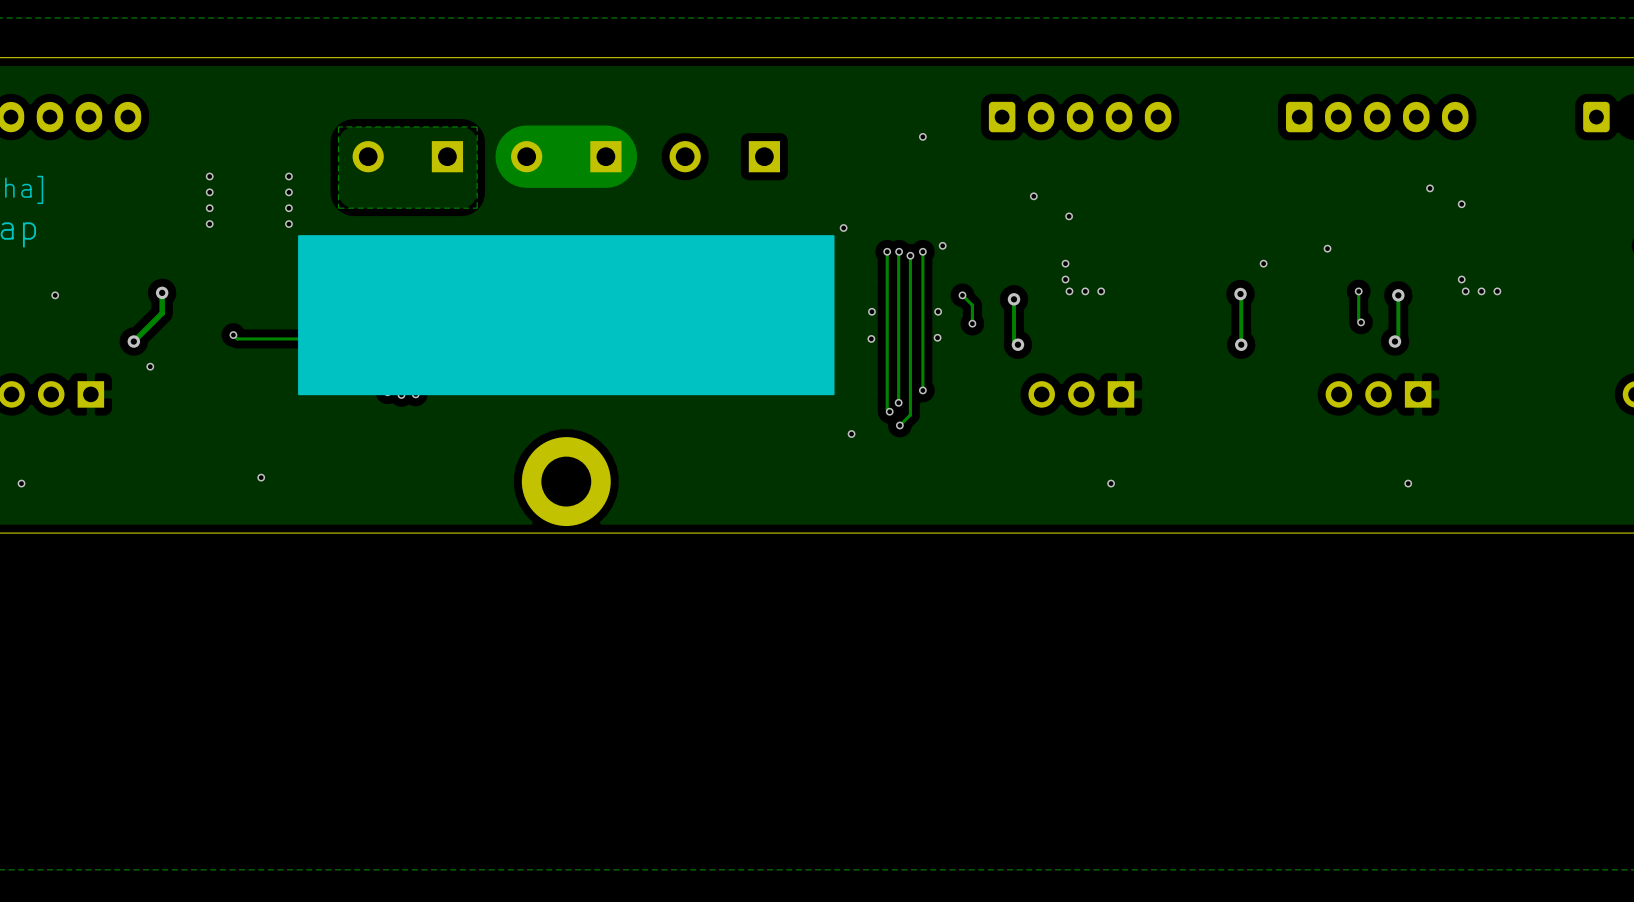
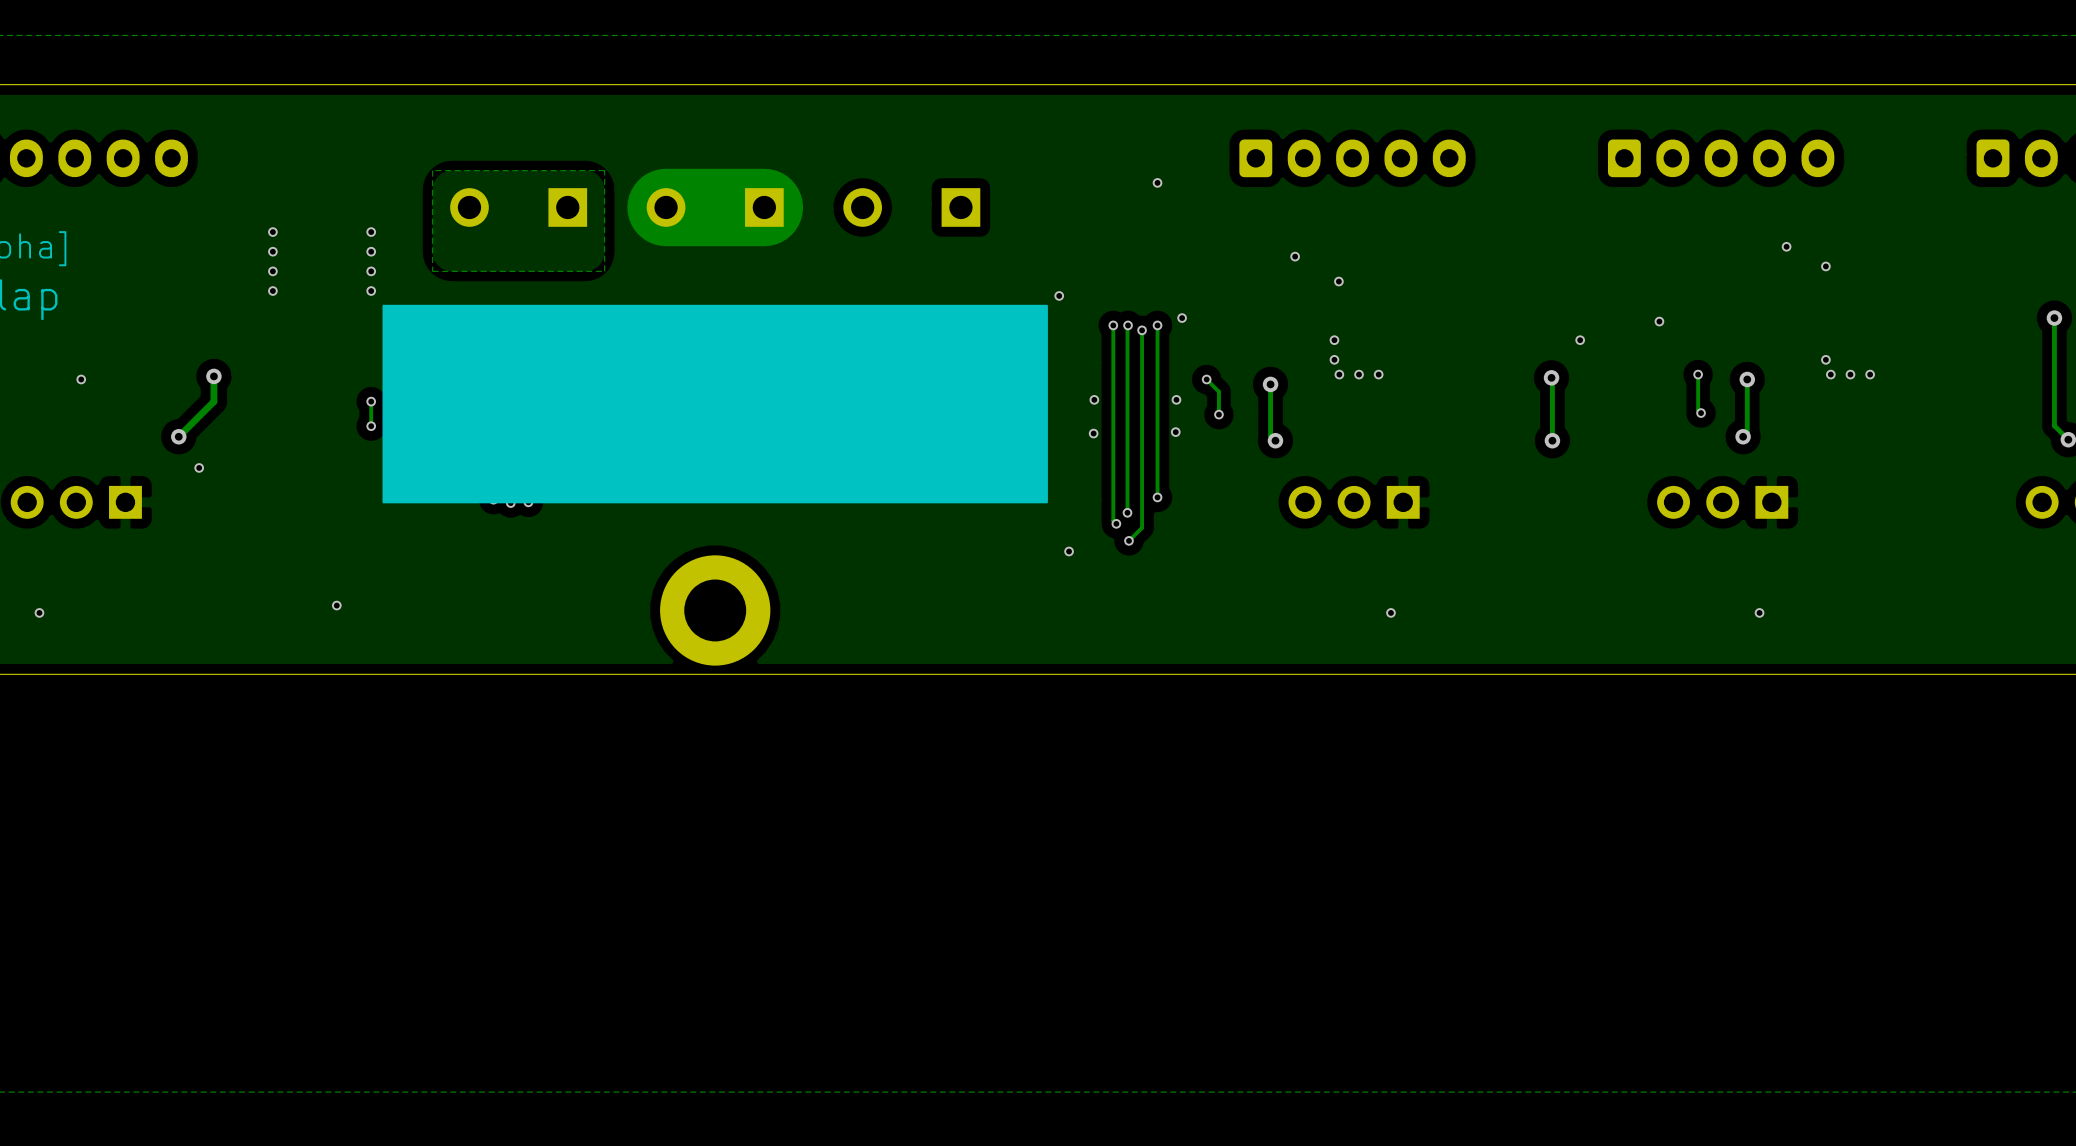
track: none -> (371, 401) (371, 426)
via: none -> (371, 401)
via: none -> (371, 426)
track: (233, 335) (237, 338) (316, 338) -> none
via: (233, 335) -> none

